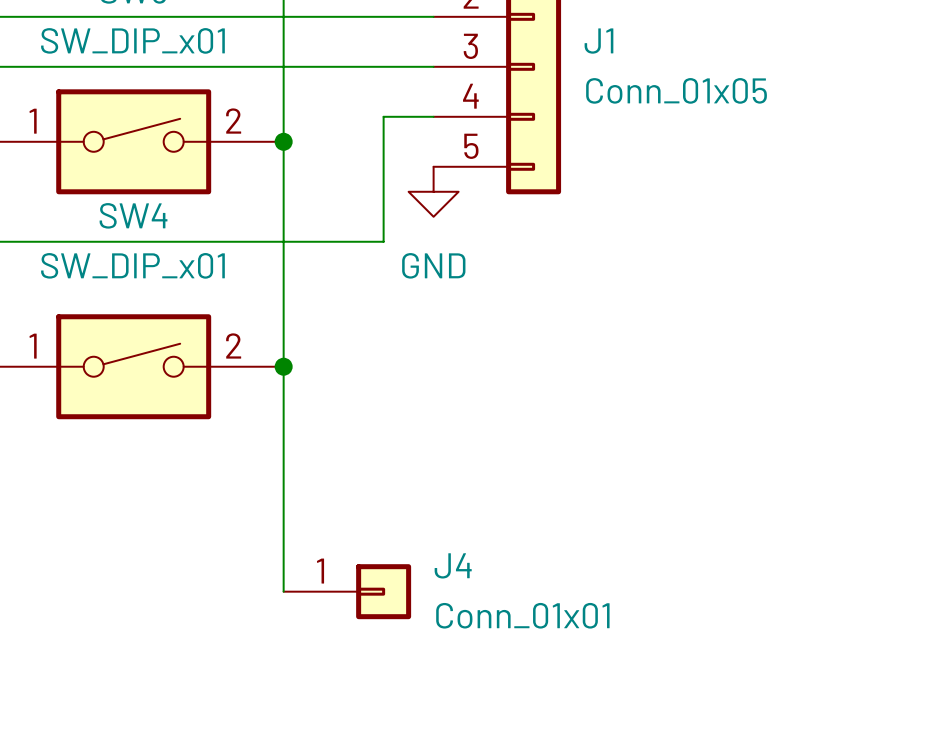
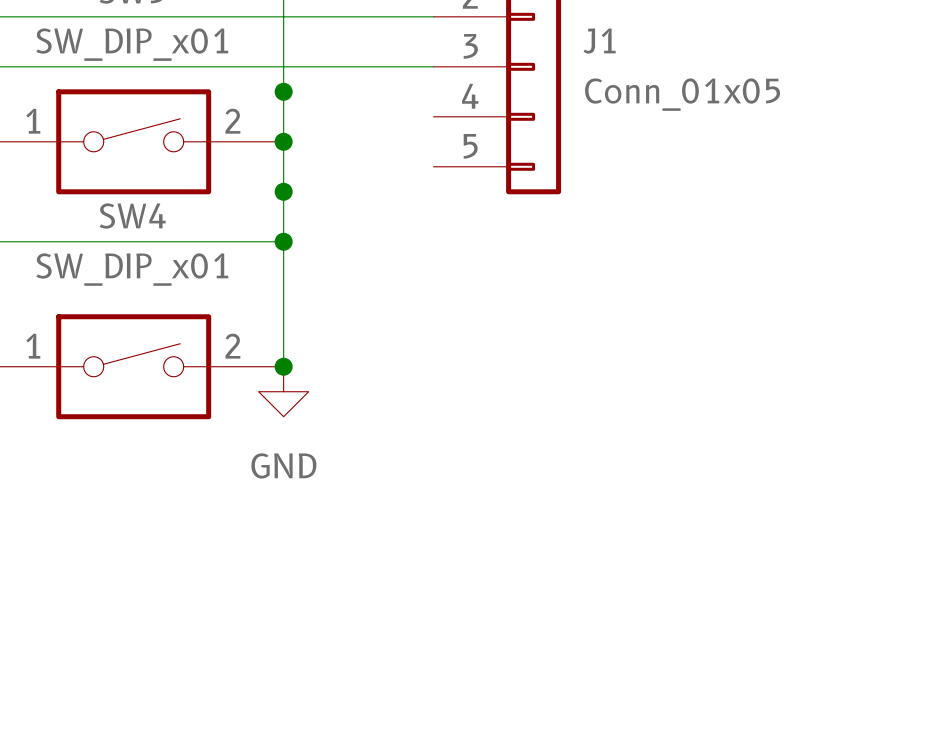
junction: none -> (283, 91)
wire: (433, 116) (383, 116) (383, 241) (283, 241) -> none
junction: none -> (283, 191)
power symbol position: GND (433, 191) -> GND (283, 391)
junction: none -> (283, 241)
wire: (283, 366) (283, 591) -> none
J4: Conn_01x01 (347, 591) -> none

